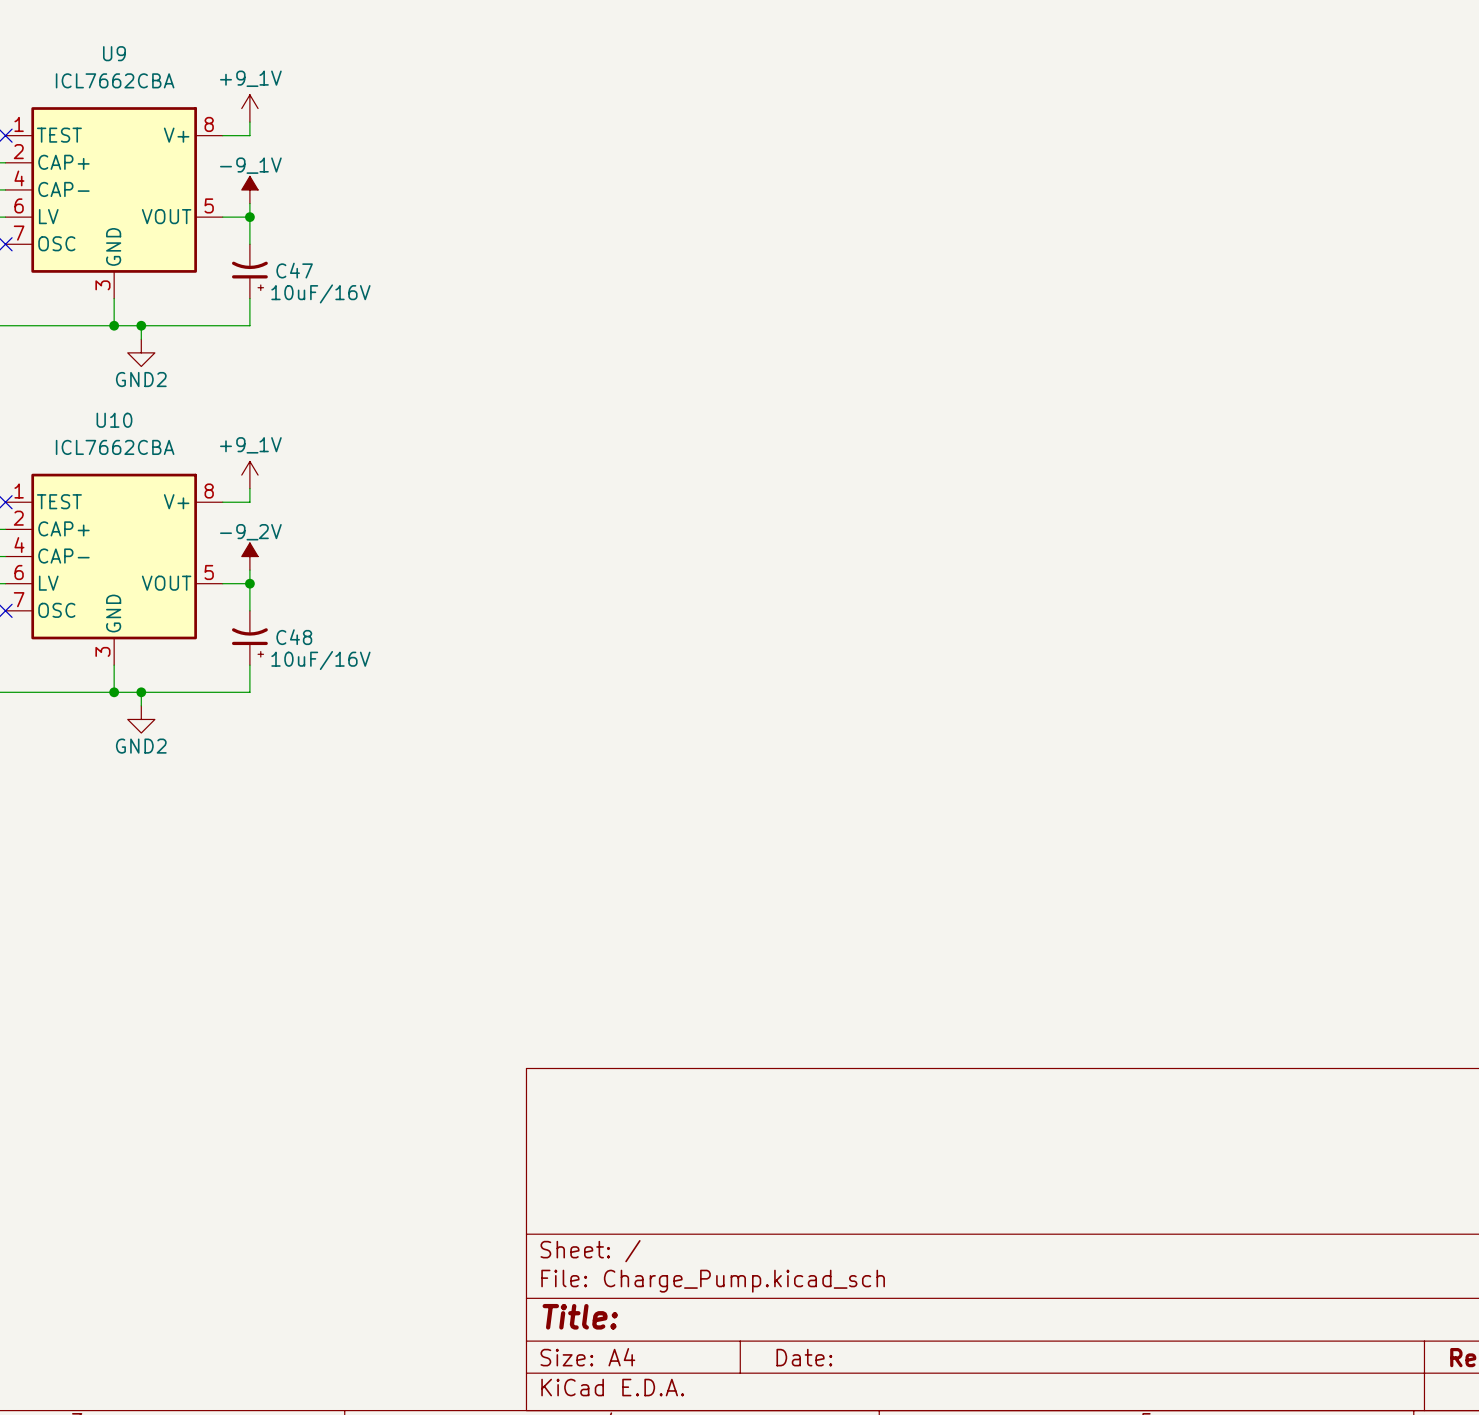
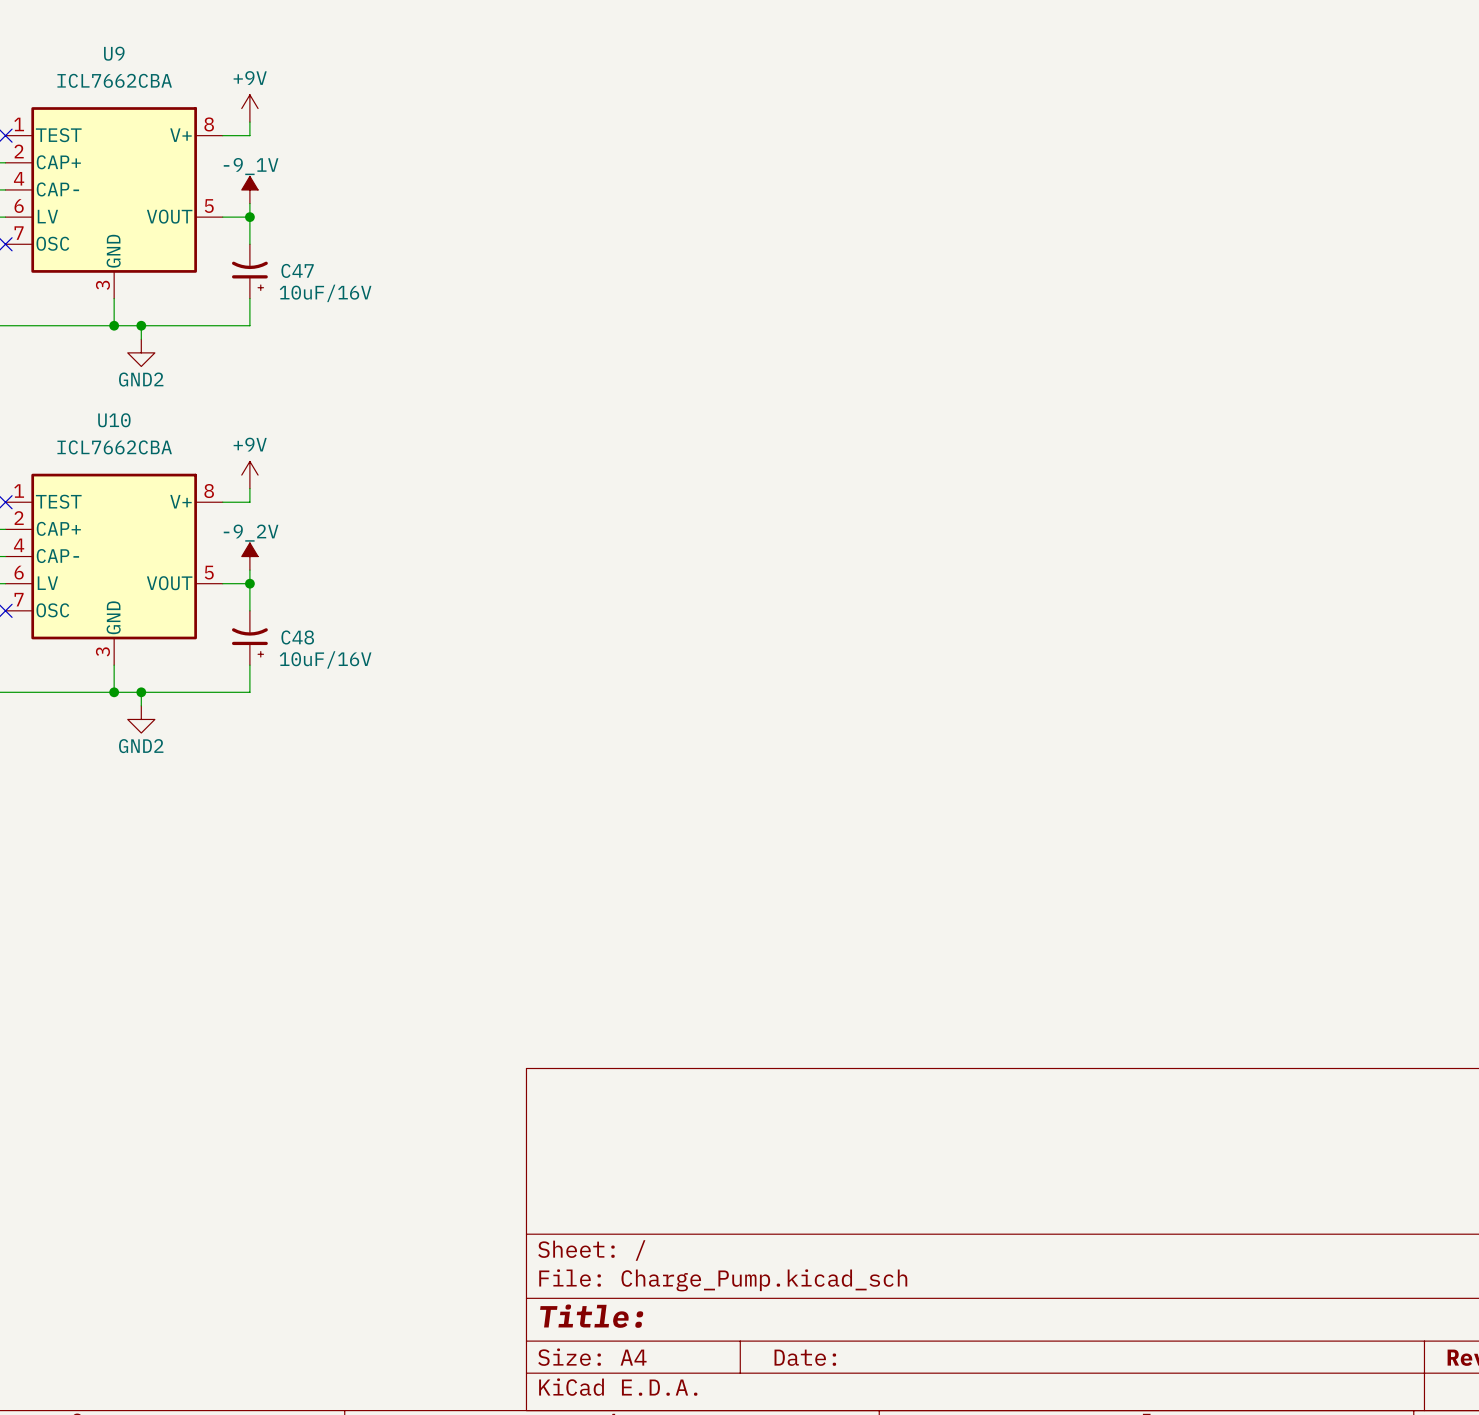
power symbol: +9_1V (249, 108) -> +9V (249, 108)
power symbol: +9_1V (249, 475) -> +9V (249, 475)

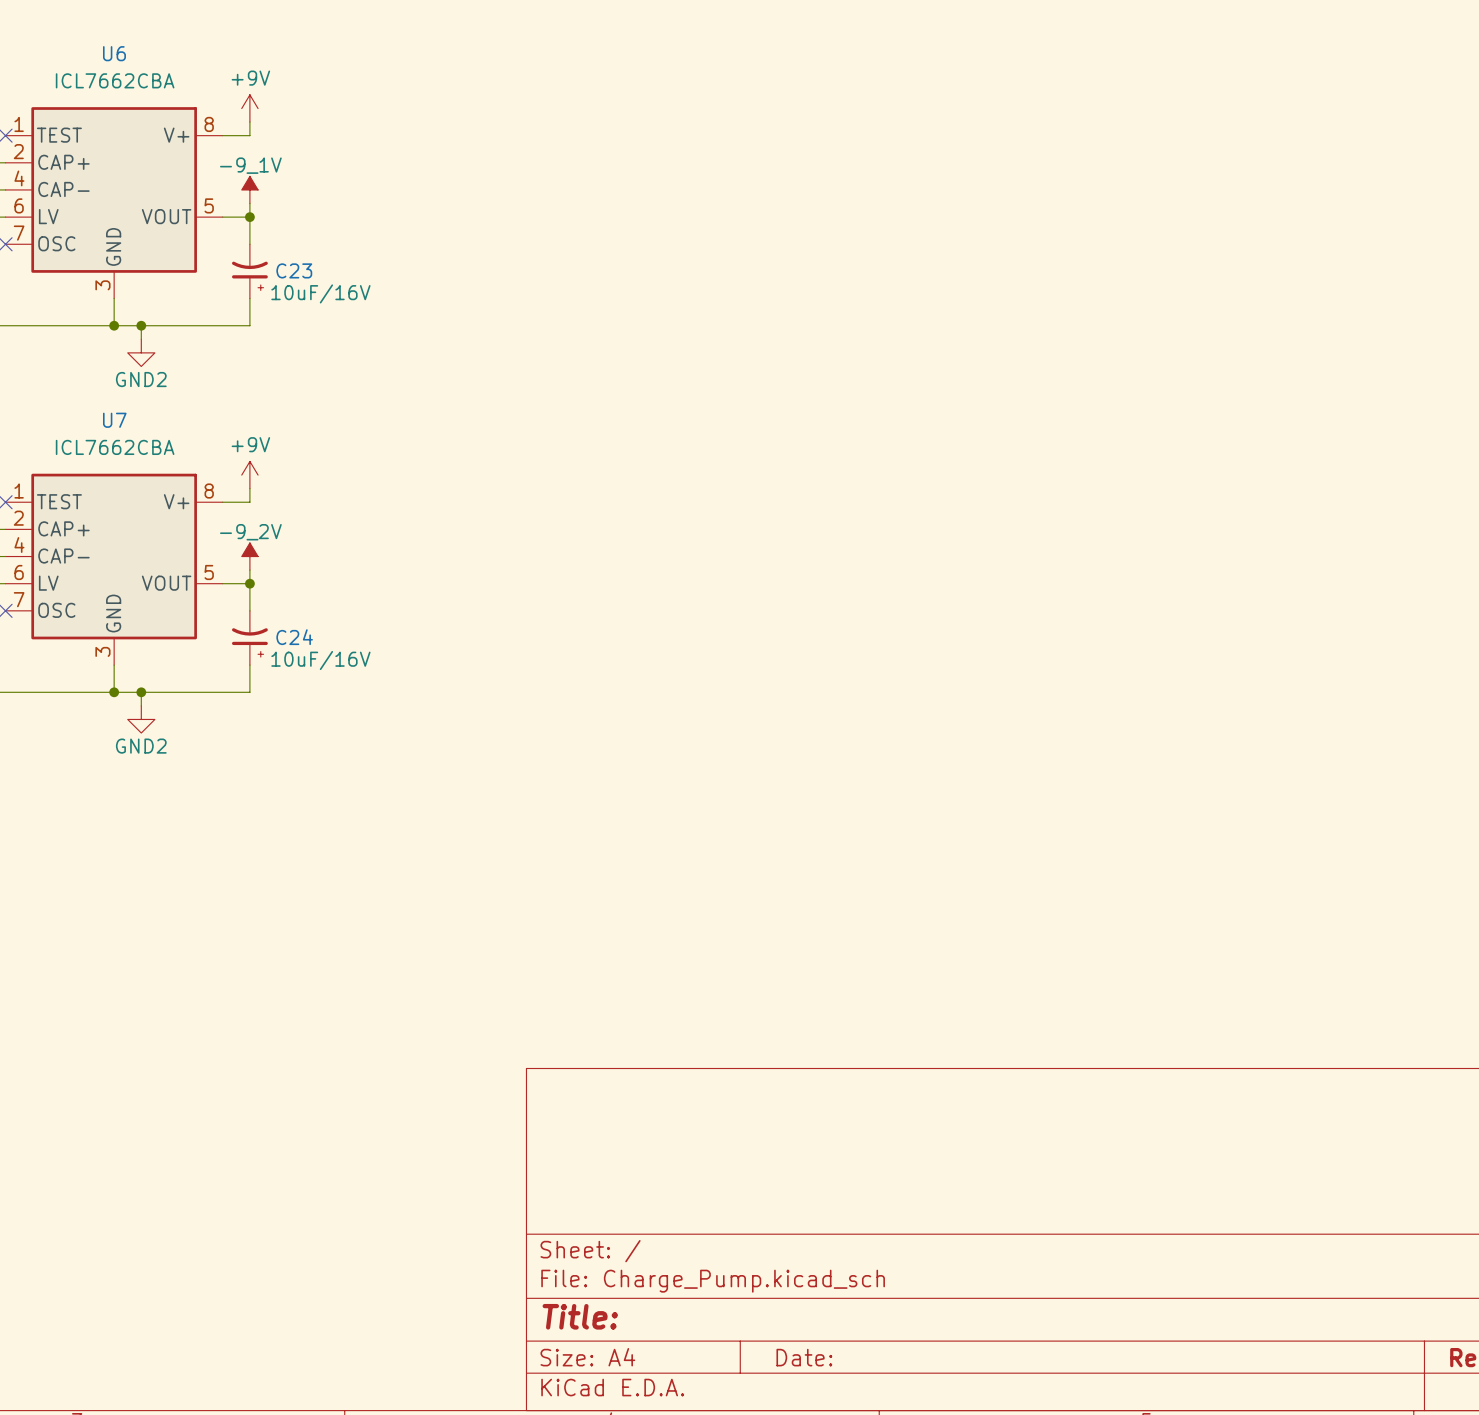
U9 name: U9 (114, 53) -> U6 (114, 53)
C47 name: C47 (297, 270) -> C23 (294, 270)
U10 name: U10 (114, 420) -> U7 (114, 420)
C48 name: C48 (297, 637) -> C24 (294, 637)

